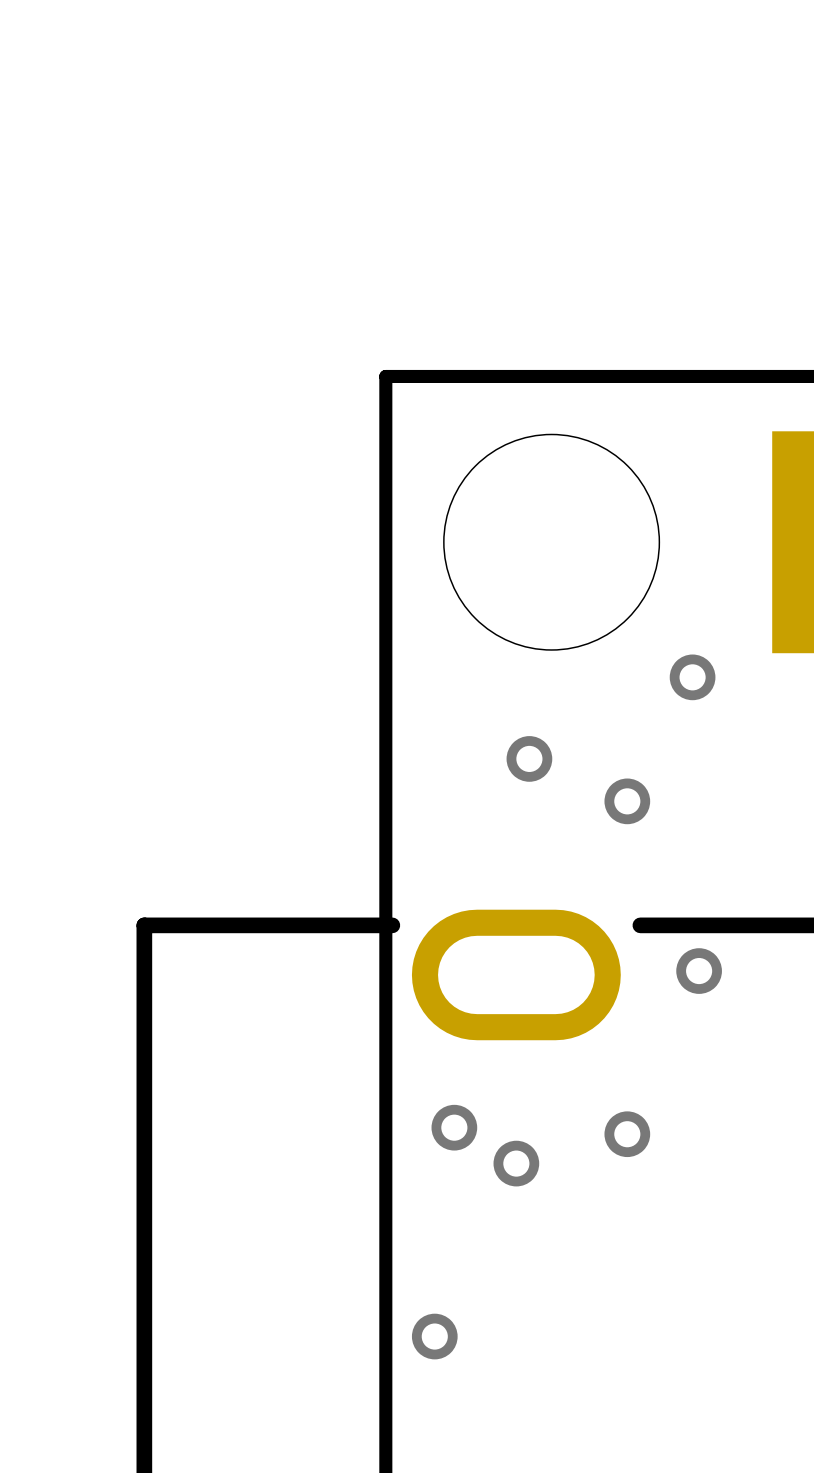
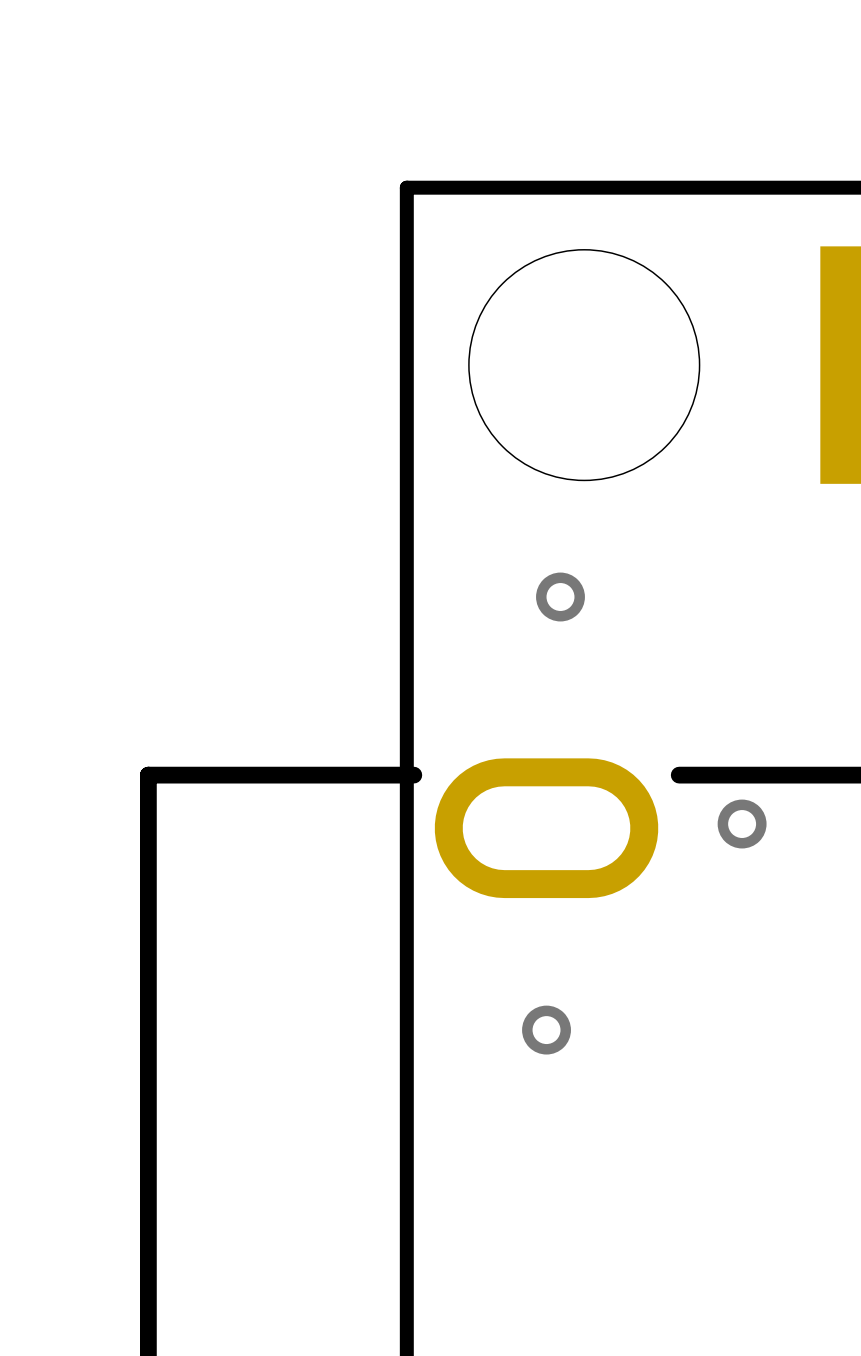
via: (692, 677) -> none
via: (627, 801) -> none
via: (454, 1127) -> none
via: (627, 1134) -> none
via: (434, 1336) -> none

